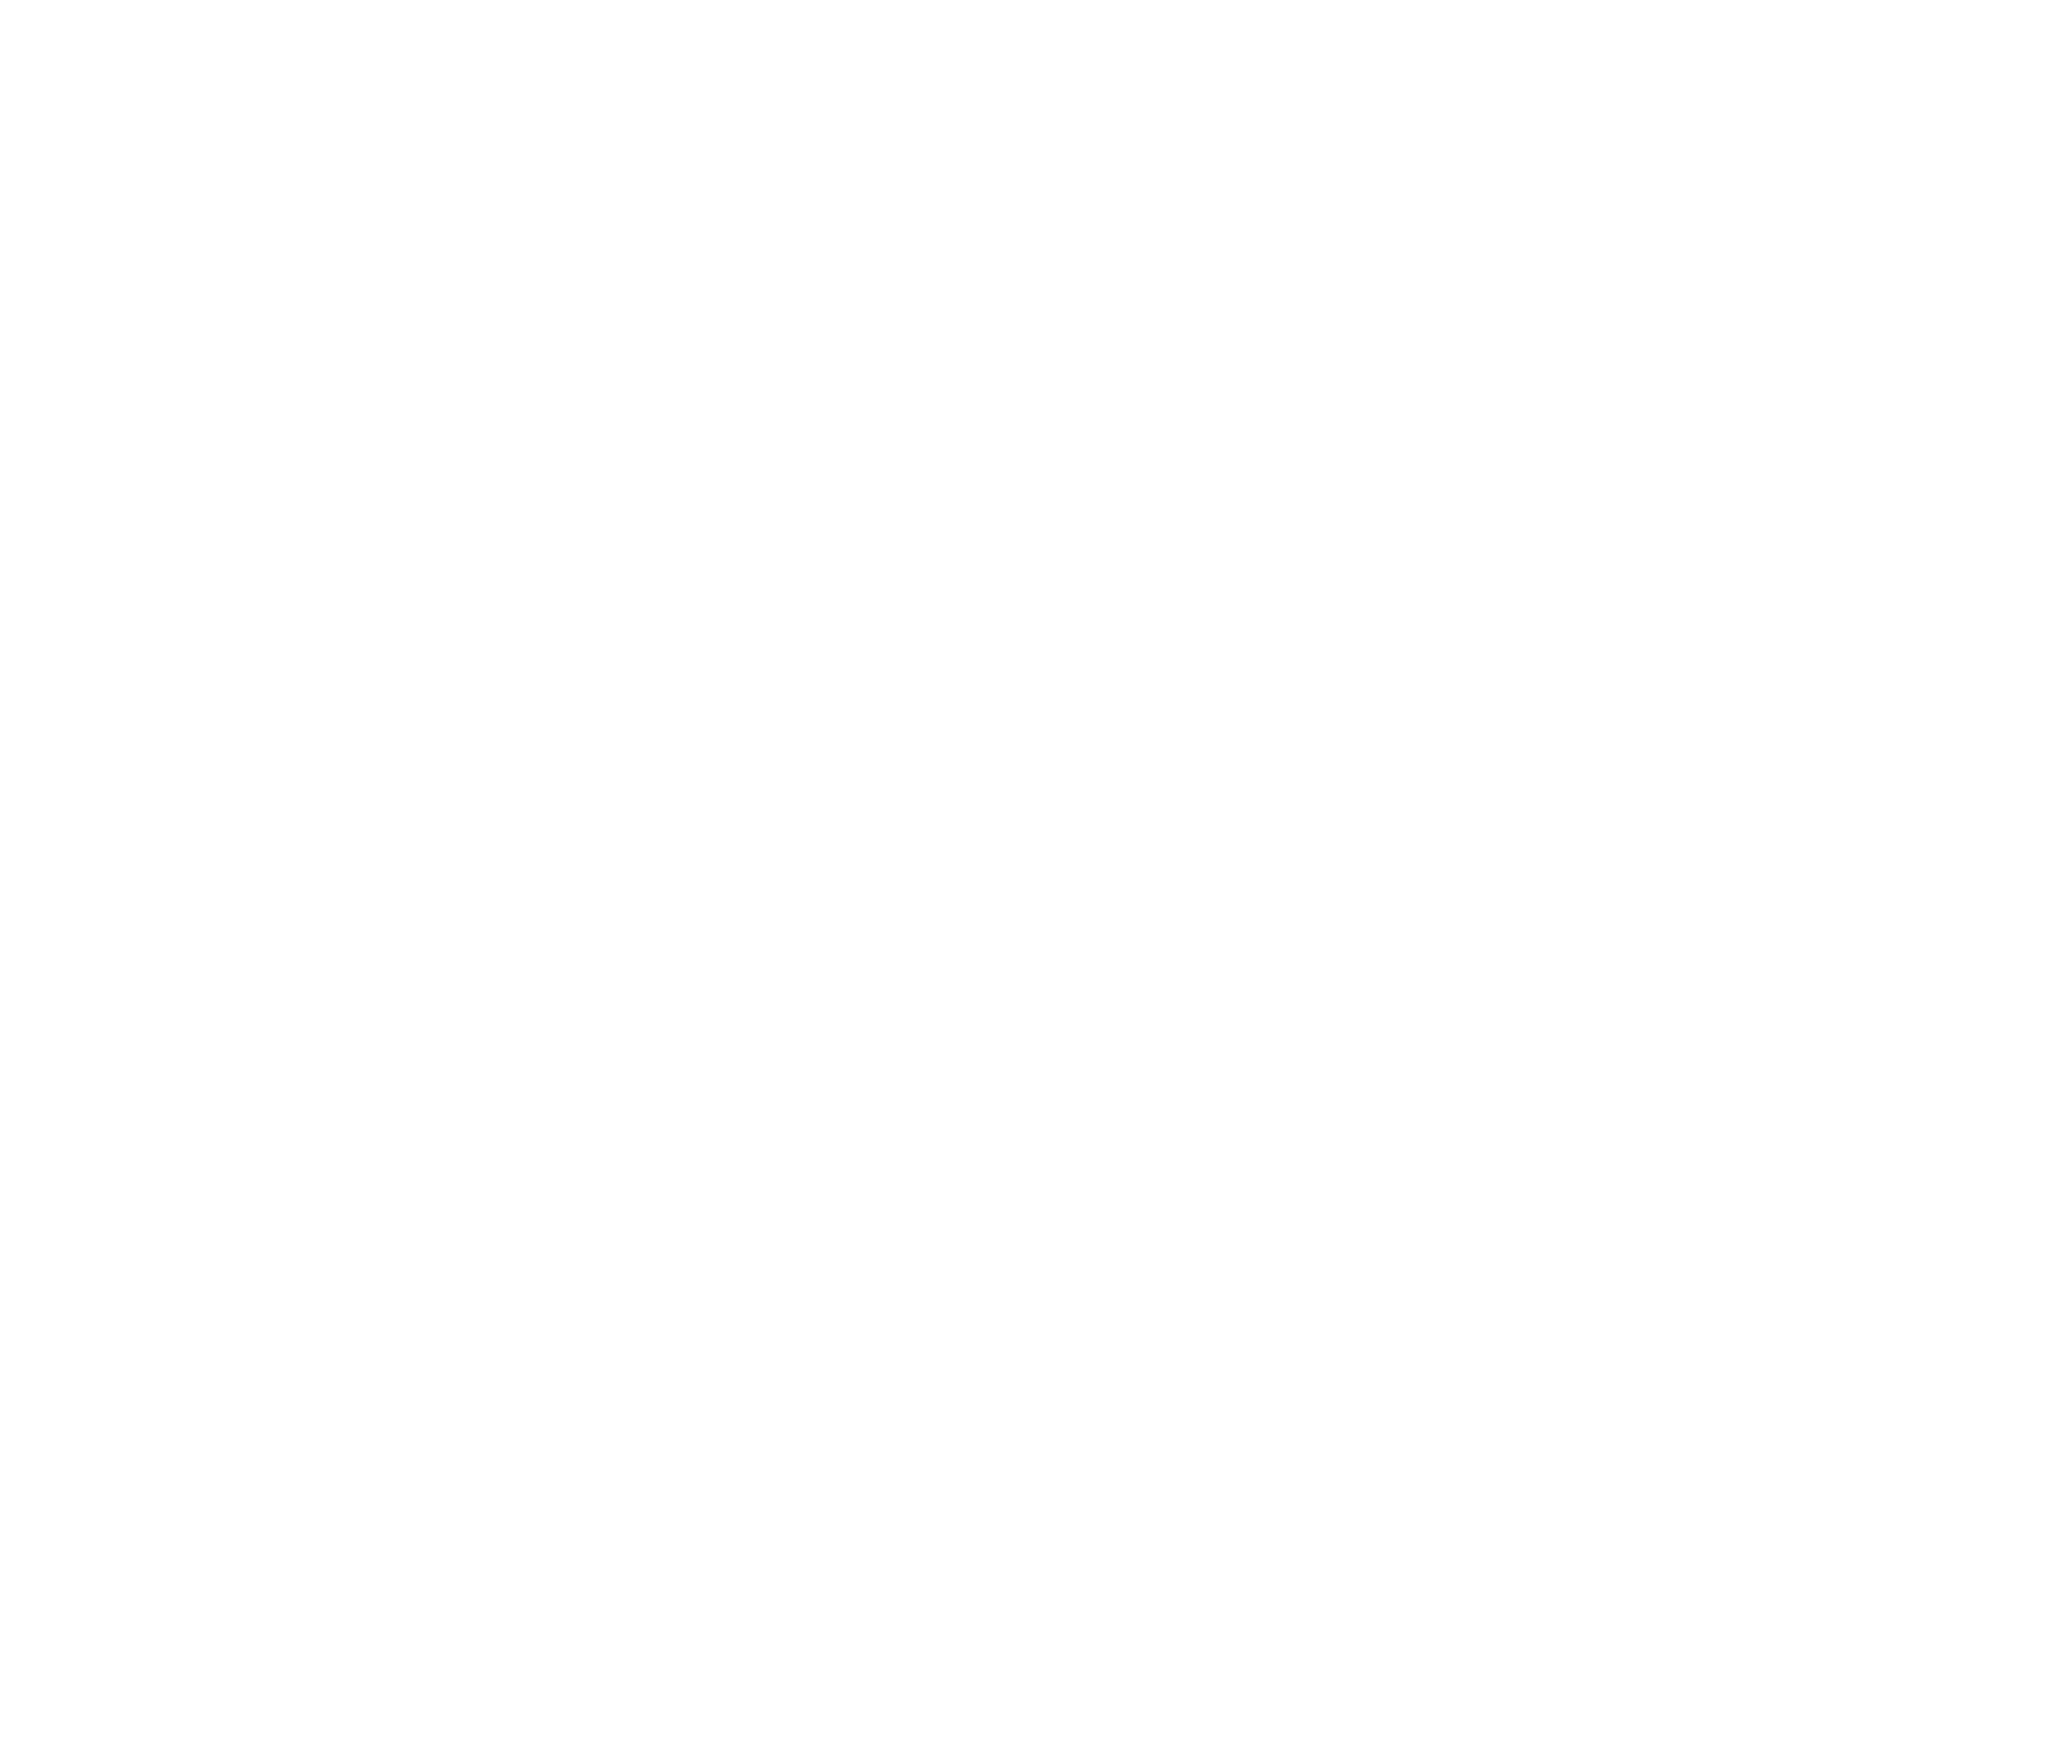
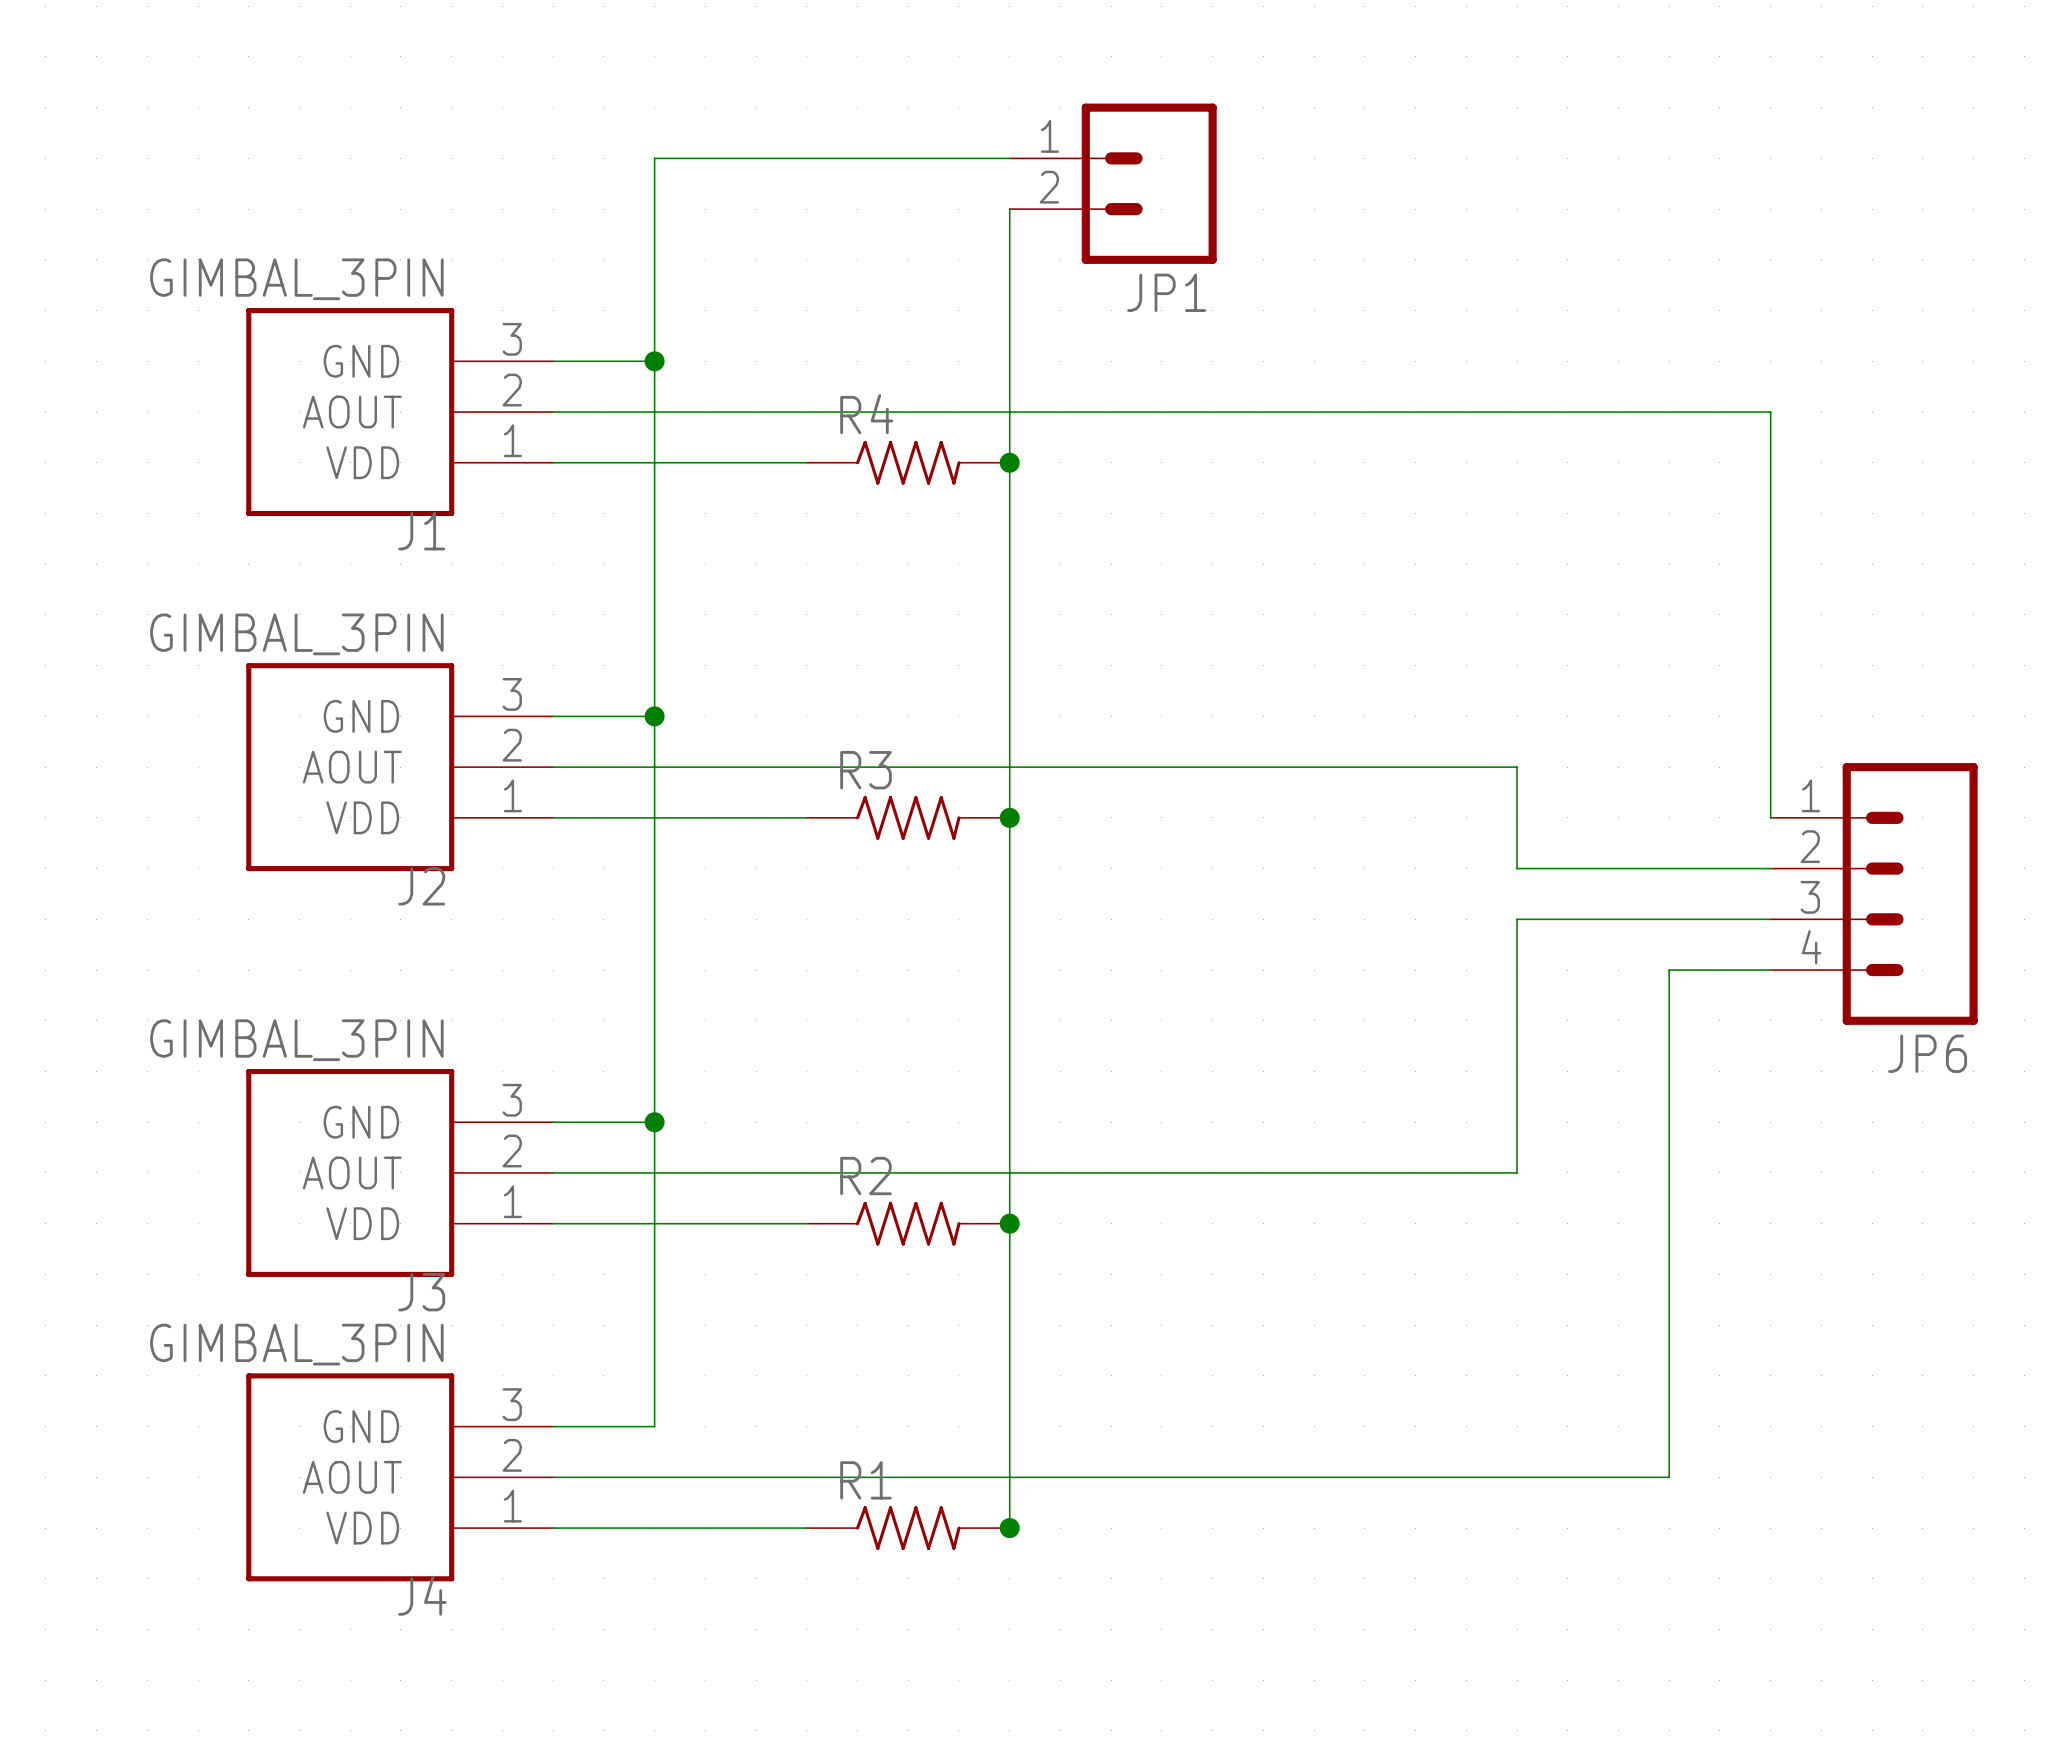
wire: none -> (1009, 158) (654, 158) (654, 1426) (553, 1426)
JP1: none -> (1113, 183)
wire: none -> (1009, 209) (1009, 1528)
wire: none -> (553, 361) (654, 361)
junction: none -> (654, 361)
J1: none -> GIMBAL_3PIN (399, 412)
wire: none -> (553, 412) (1770, 412) (1770, 817)
wire: none -> (553, 462) (806, 462)
R4: none -> (908, 462)
junction: none -> (1009, 462)
wire: none -> (553, 716) (654, 716)
junction: none -> (654, 716)
J2: none -> GIMBAL_3PIN (399, 767)
wire: none -> (553, 767) (1517, 767) (1517, 868) (1770, 868)
wire: none -> (553, 817) (806, 817)
R3: none -> (908, 817)
junction: none -> (1009, 817)
JP6: none -> (1874, 893)
wire: none -> (1770, 919) (1517, 919) (1517, 1172) (553, 1172)
wire: none -> (1770, 970) (1669, 970) (1669, 1477) (553, 1477)
wire: none -> (553, 1122) (654, 1122)
junction: none -> (654, 1122)
J3: none -> GIMBAL_3PIN (399, 1172)
wire: none -> (553, 1223) (806, 1223)
R2: none -> (908, 1223)
junction: none -> (1009, 1223)
J4: none -> GIMBAL_3PIN (399, 1477)
wire: none -> (553, 1528) (806, 1528)
R1: none -> (908, 1528)
junction: none -> (1009, 1528)

